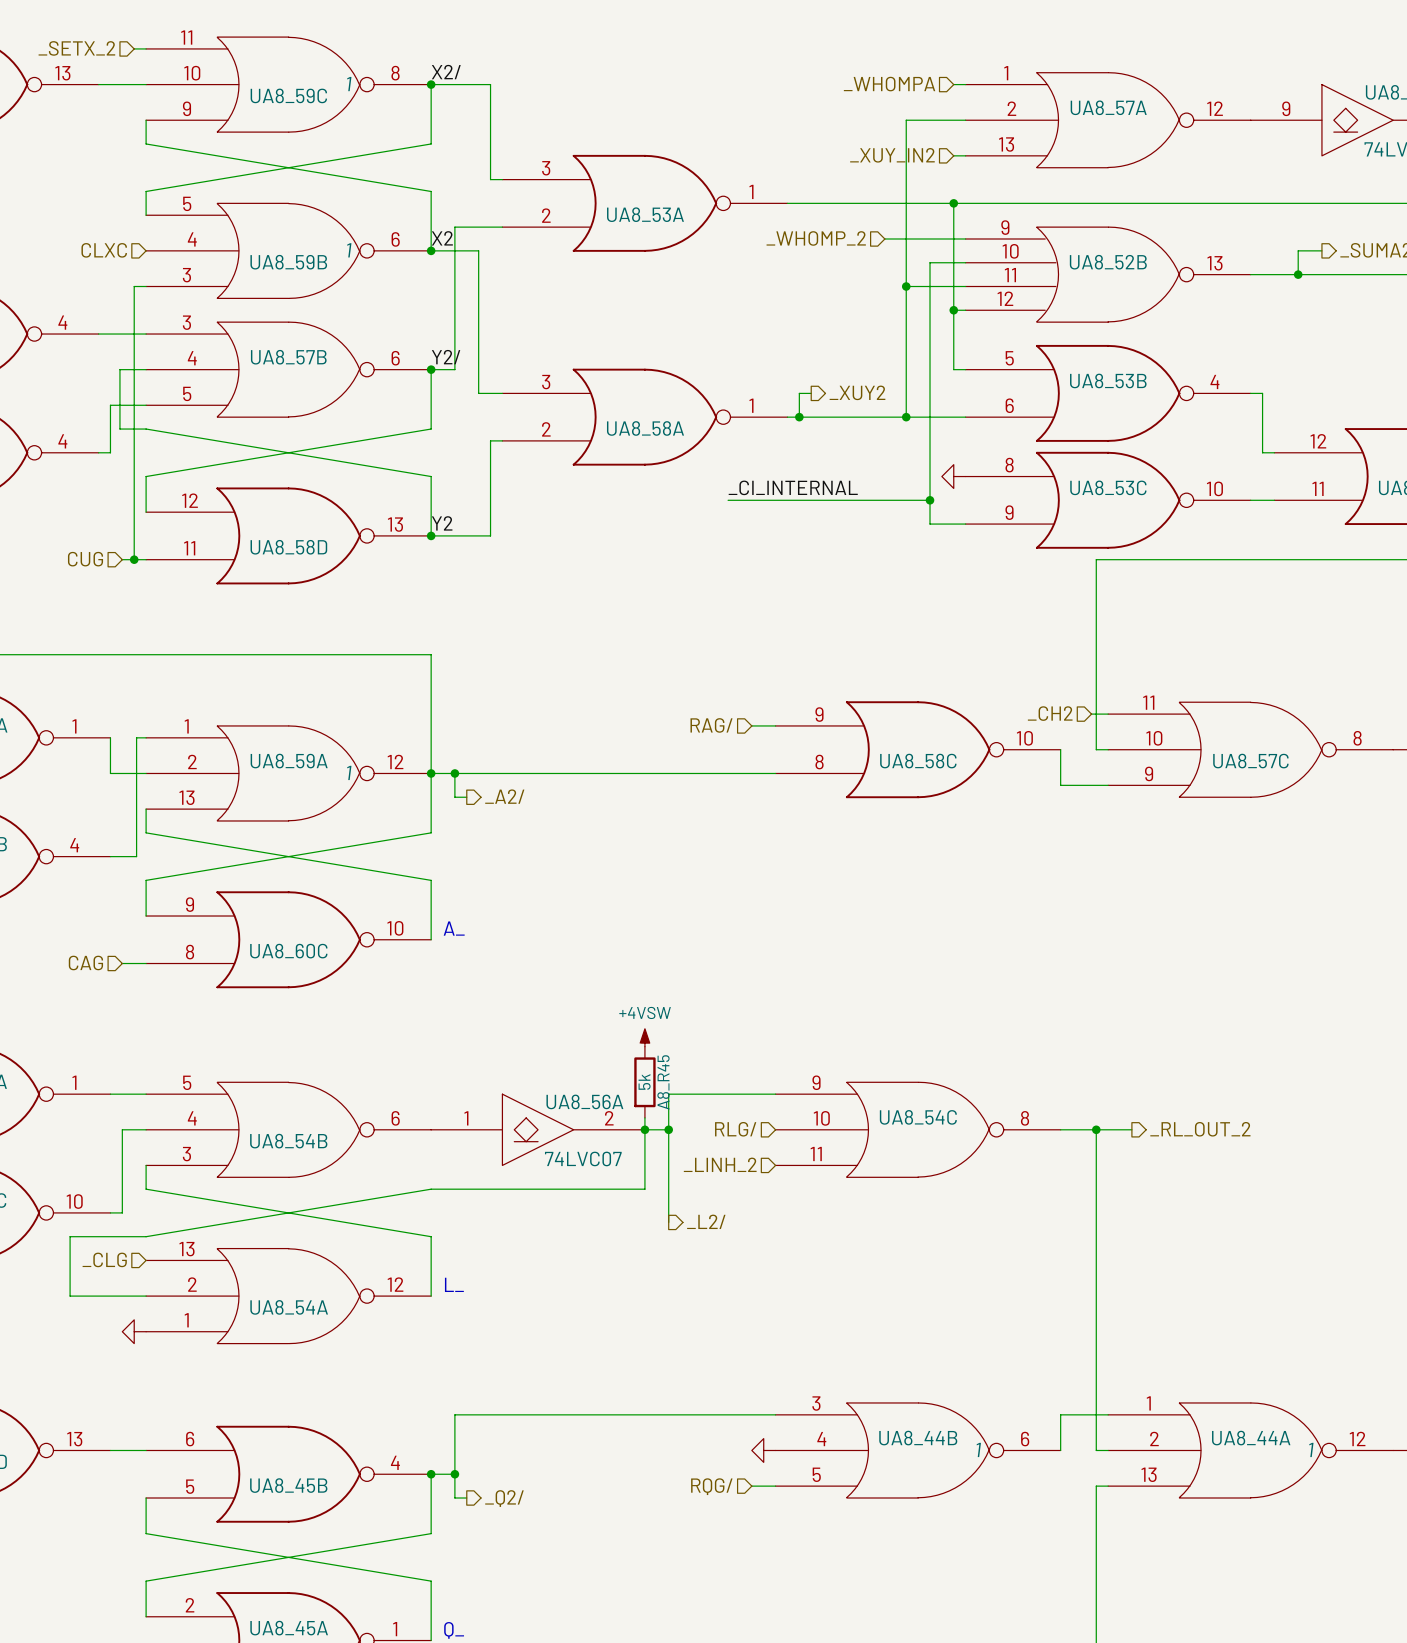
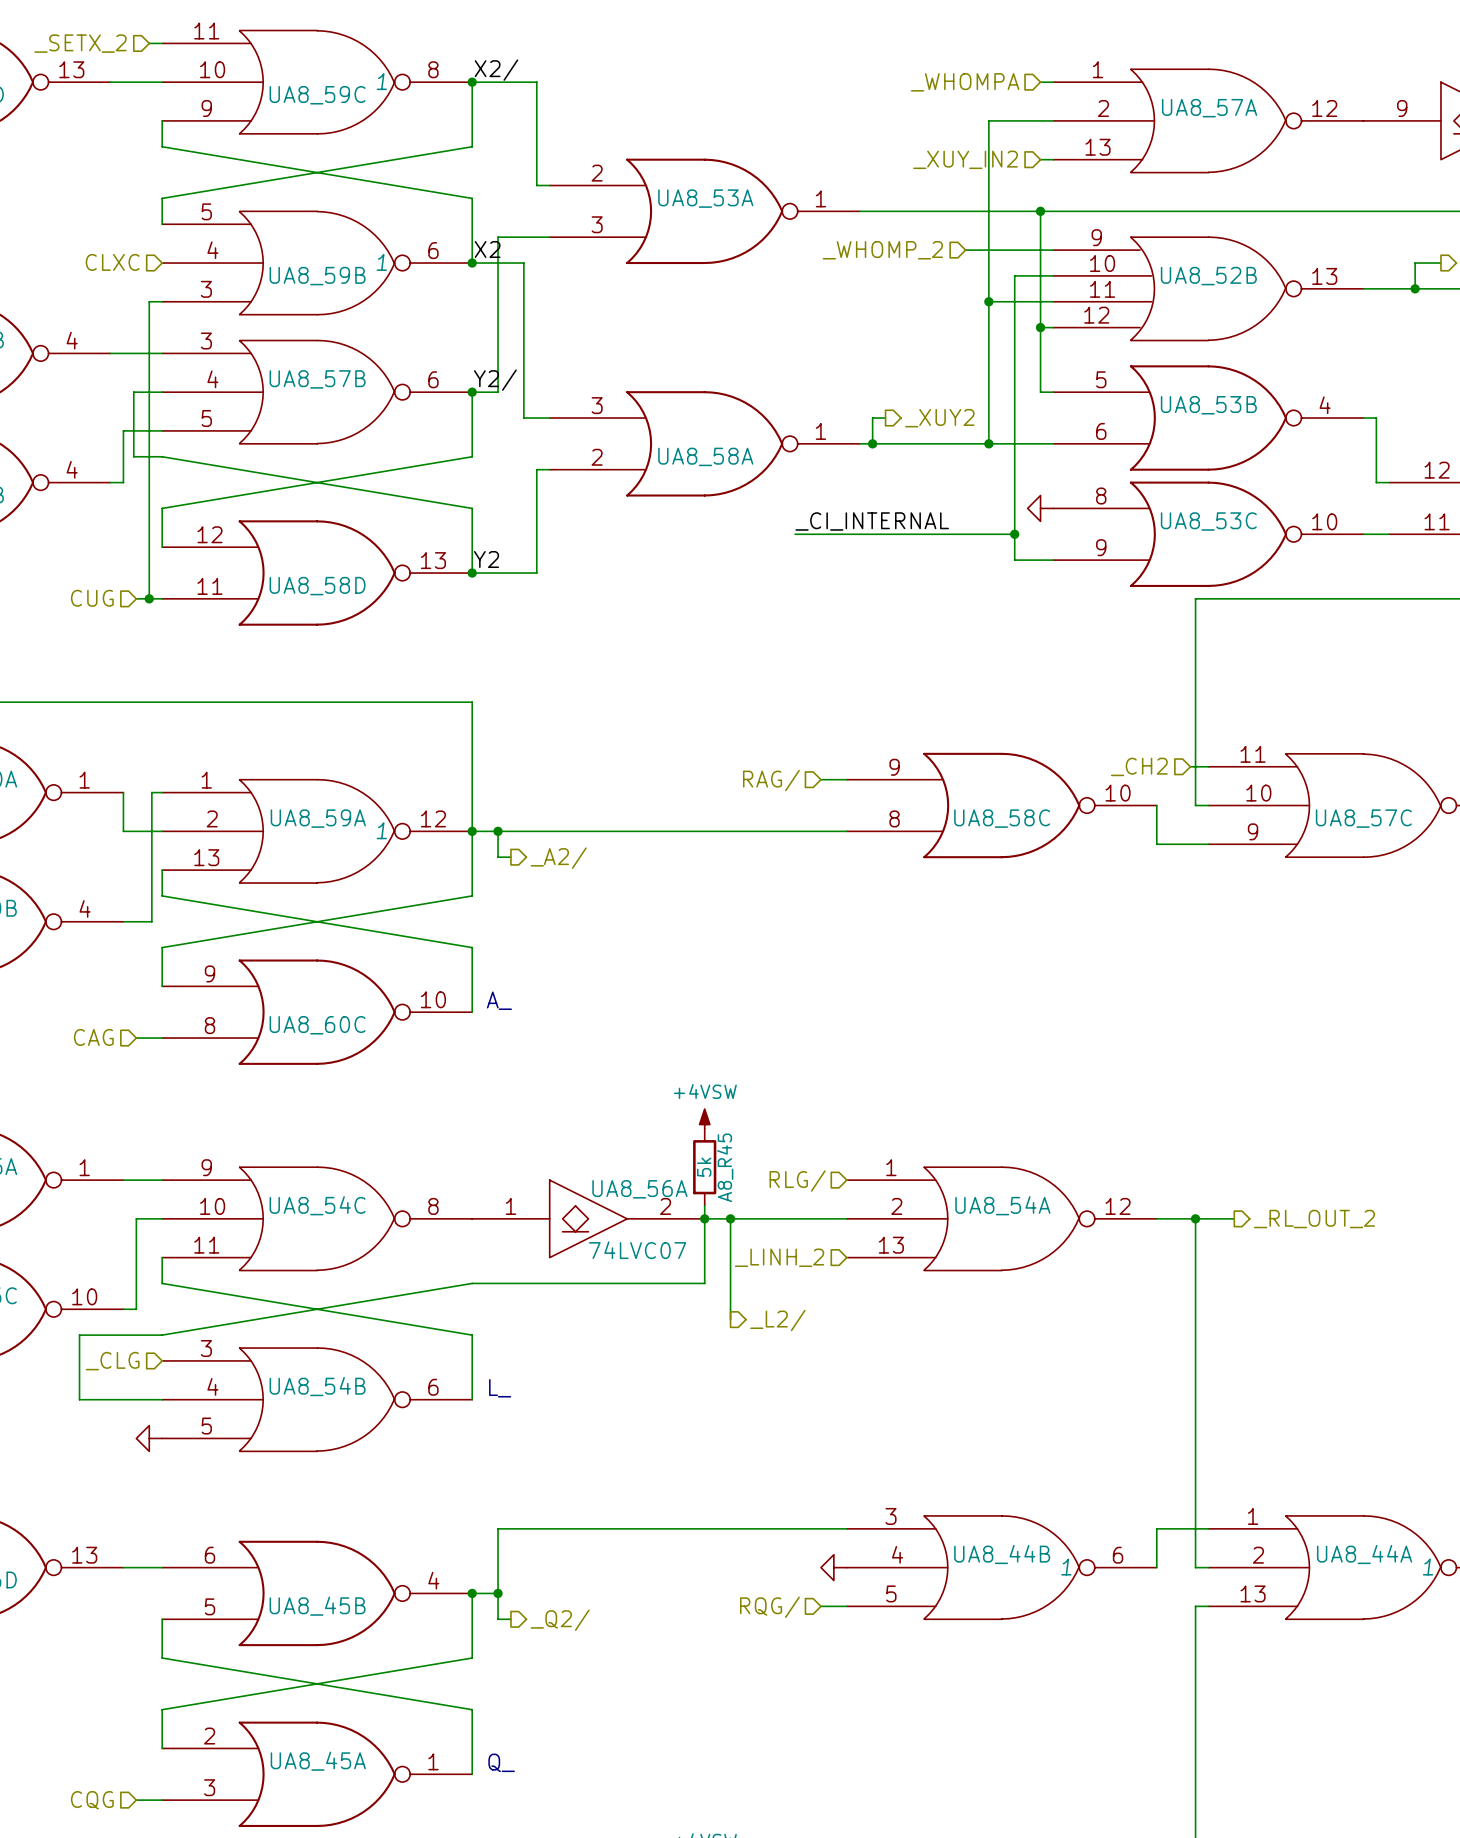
UA8_53A flip: as is (644, 203) -> up-down (704, 211)
wire: (775, 1094) (668, 1094) (668, 1129) -> (846, 1218) (730, 1218)
UA8_54B flip: as is (288, 1129) -> up-down (317, 1399)
hierarchical label position: RLG/ (735, 1129) -> RLG/ (797, 1181)
UA8_54C position: (918, 1129) -> (317, 1218)
UA8_54A flip: as is (288, 1296) -> up-down (1001, 1218)
UA8_54A position: (288, 1296) -> (1001, 1218)

